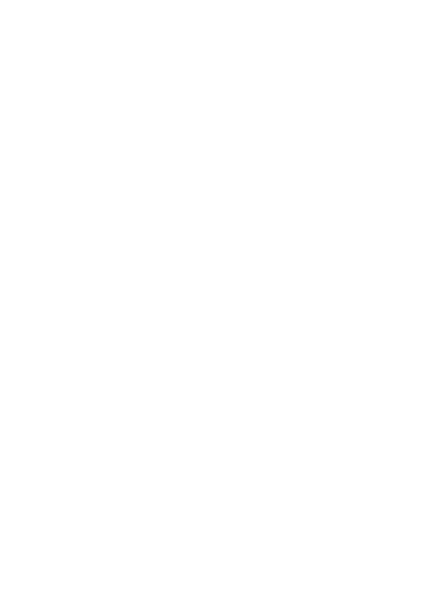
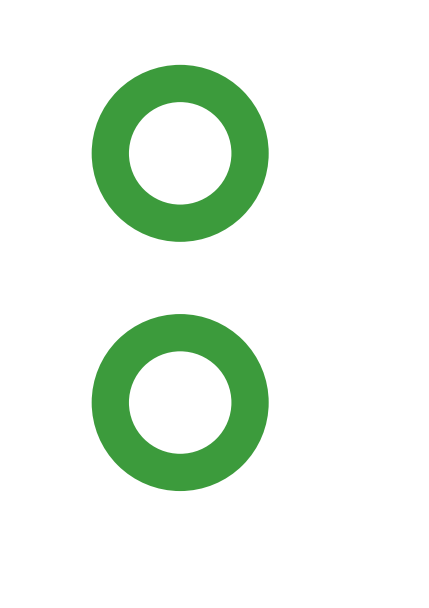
part: none -> (180, 153)
part: none -> (180, 402)

